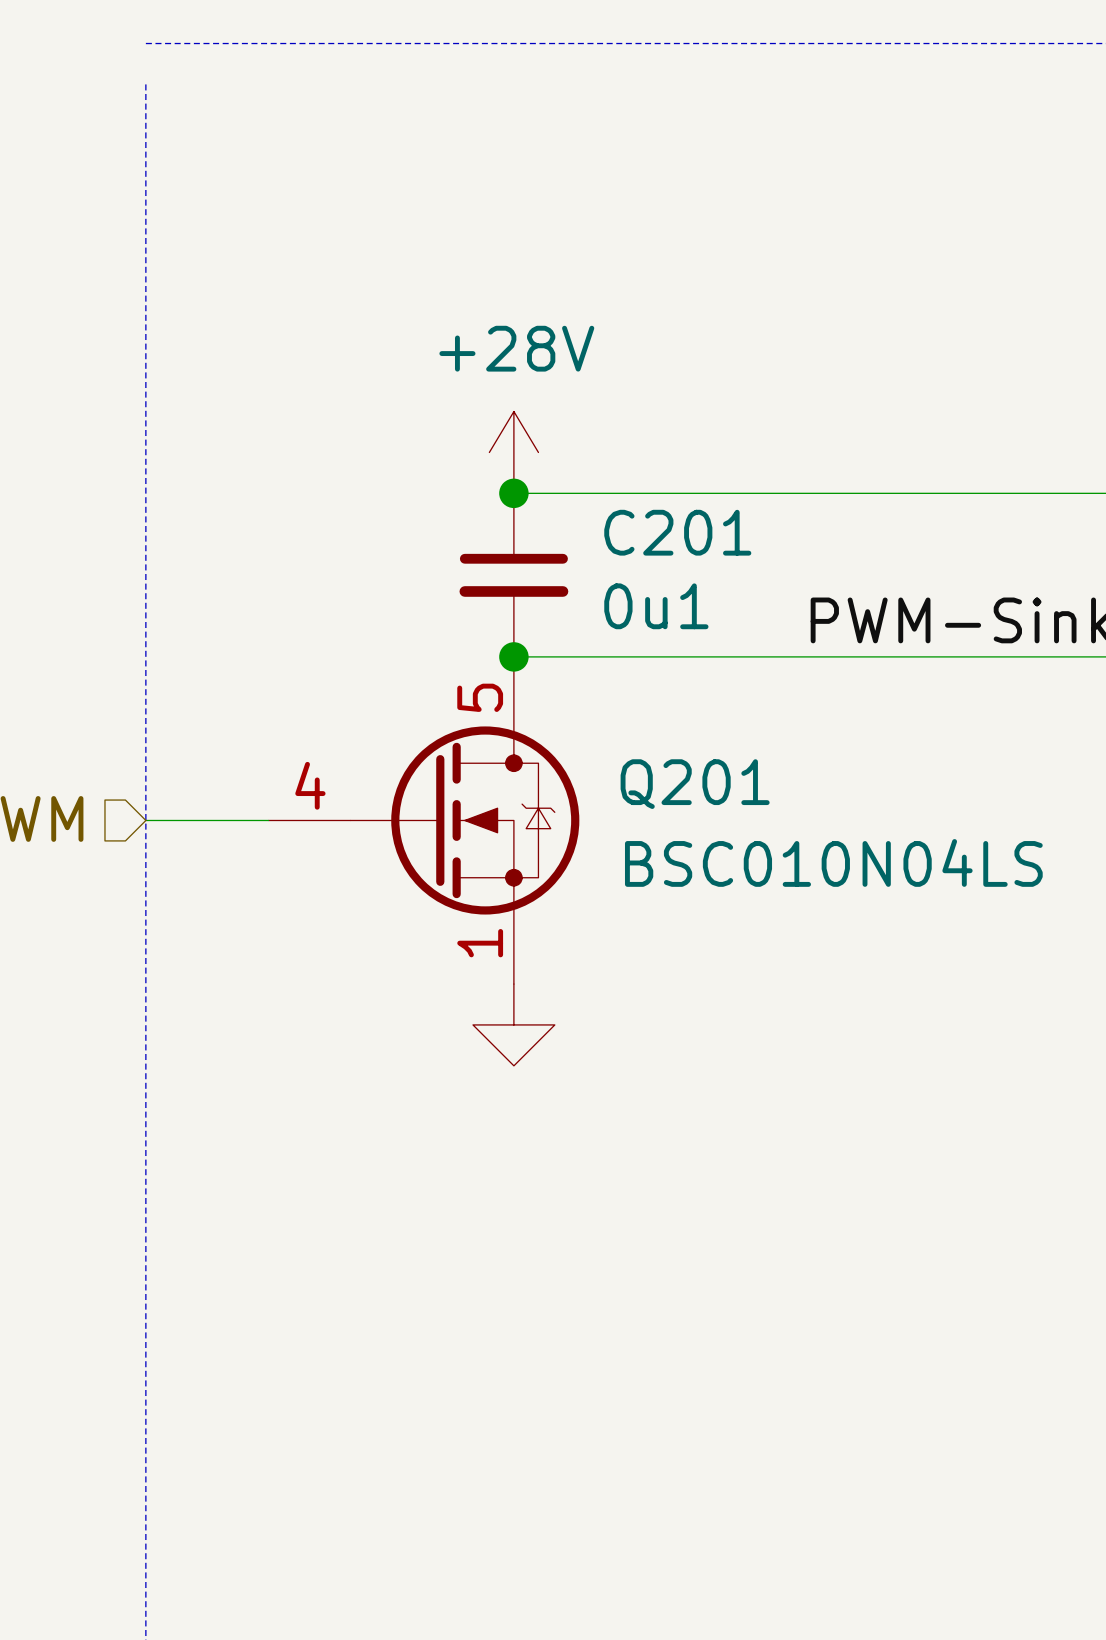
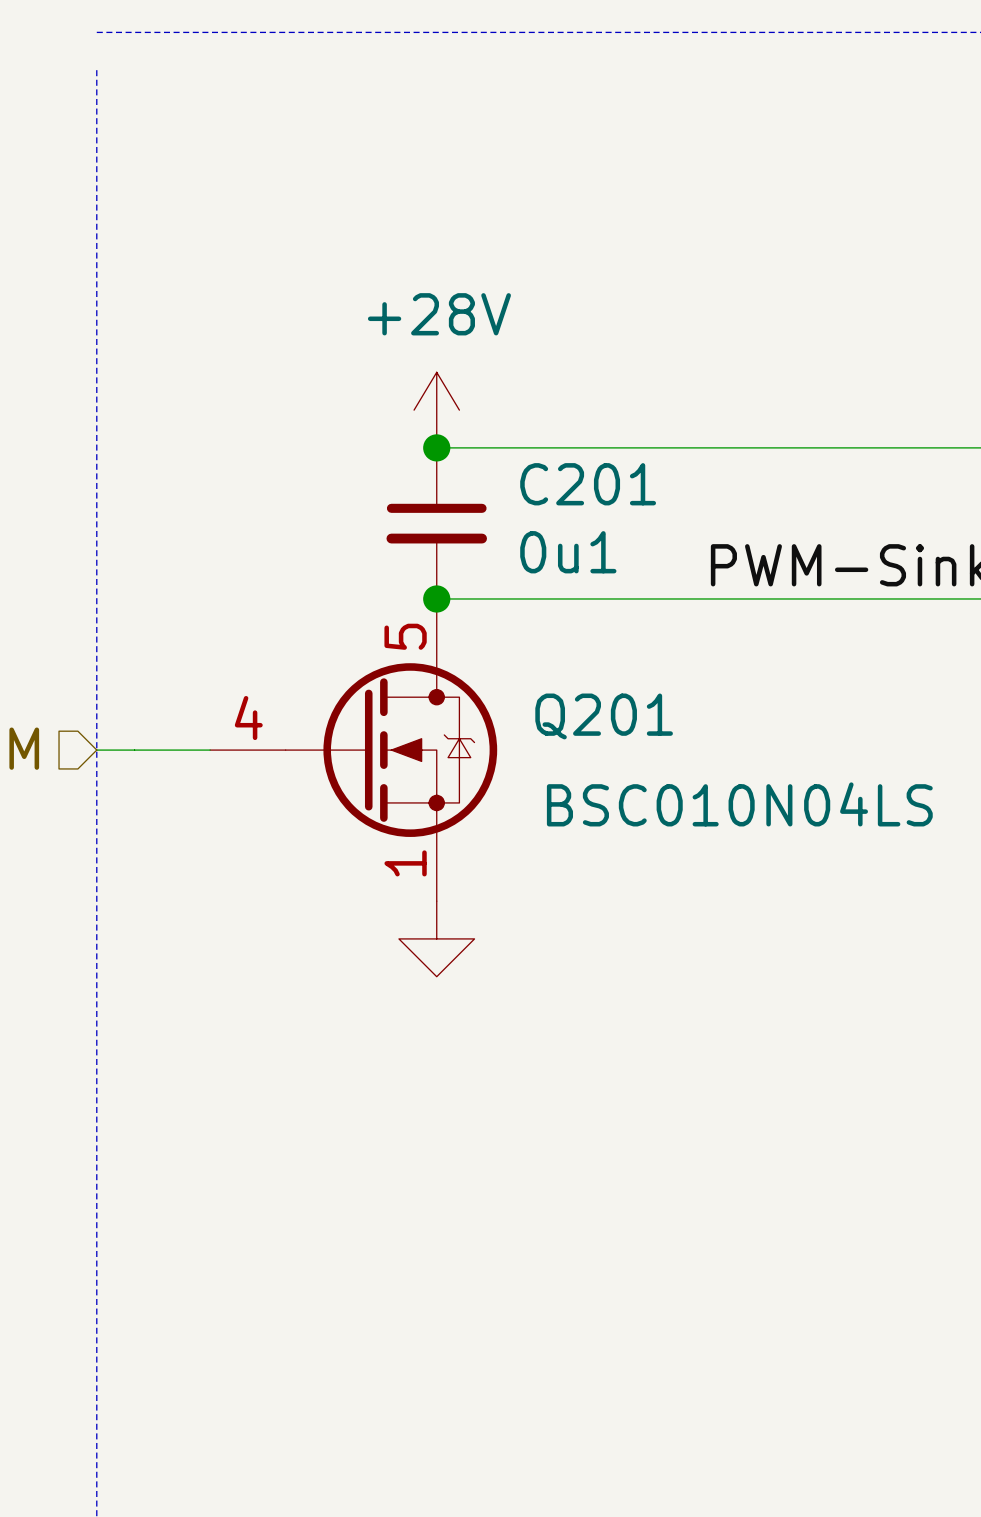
Q201 value position: BSC010N04LS (833, 862) -> BSC010N04LS (739, 804)

